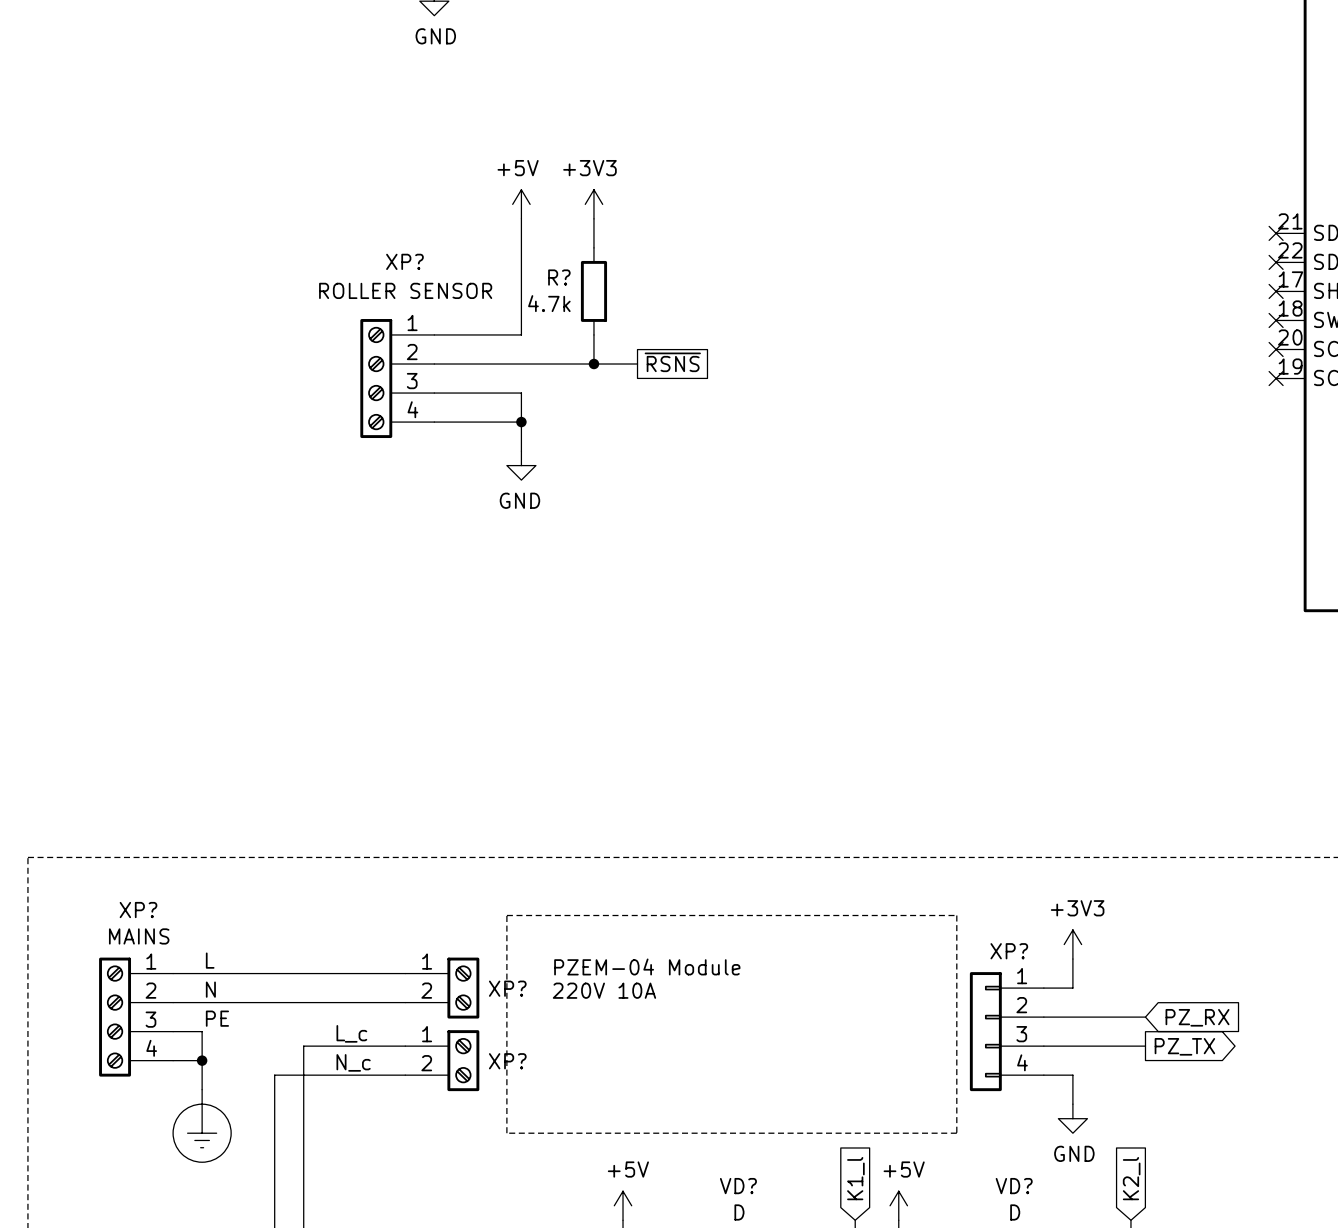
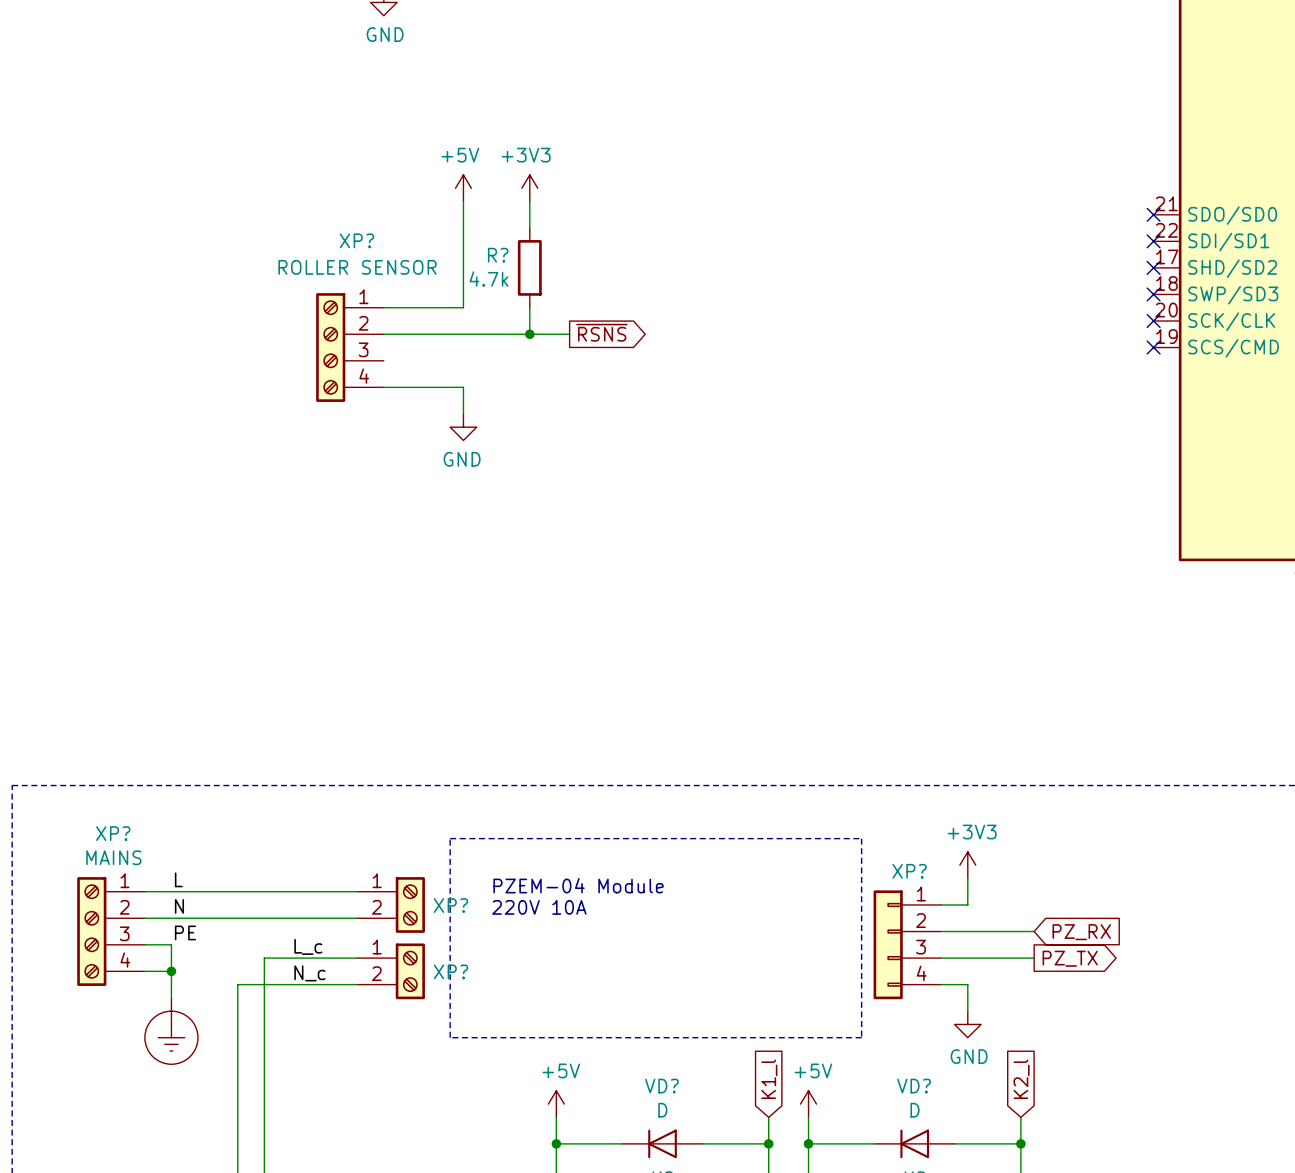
global label shape: passive (672, 362) -> output (601, 332)
wire: (434, 393) (521, 393) (521, 422) -> none
junction: (521, 422) -> none

